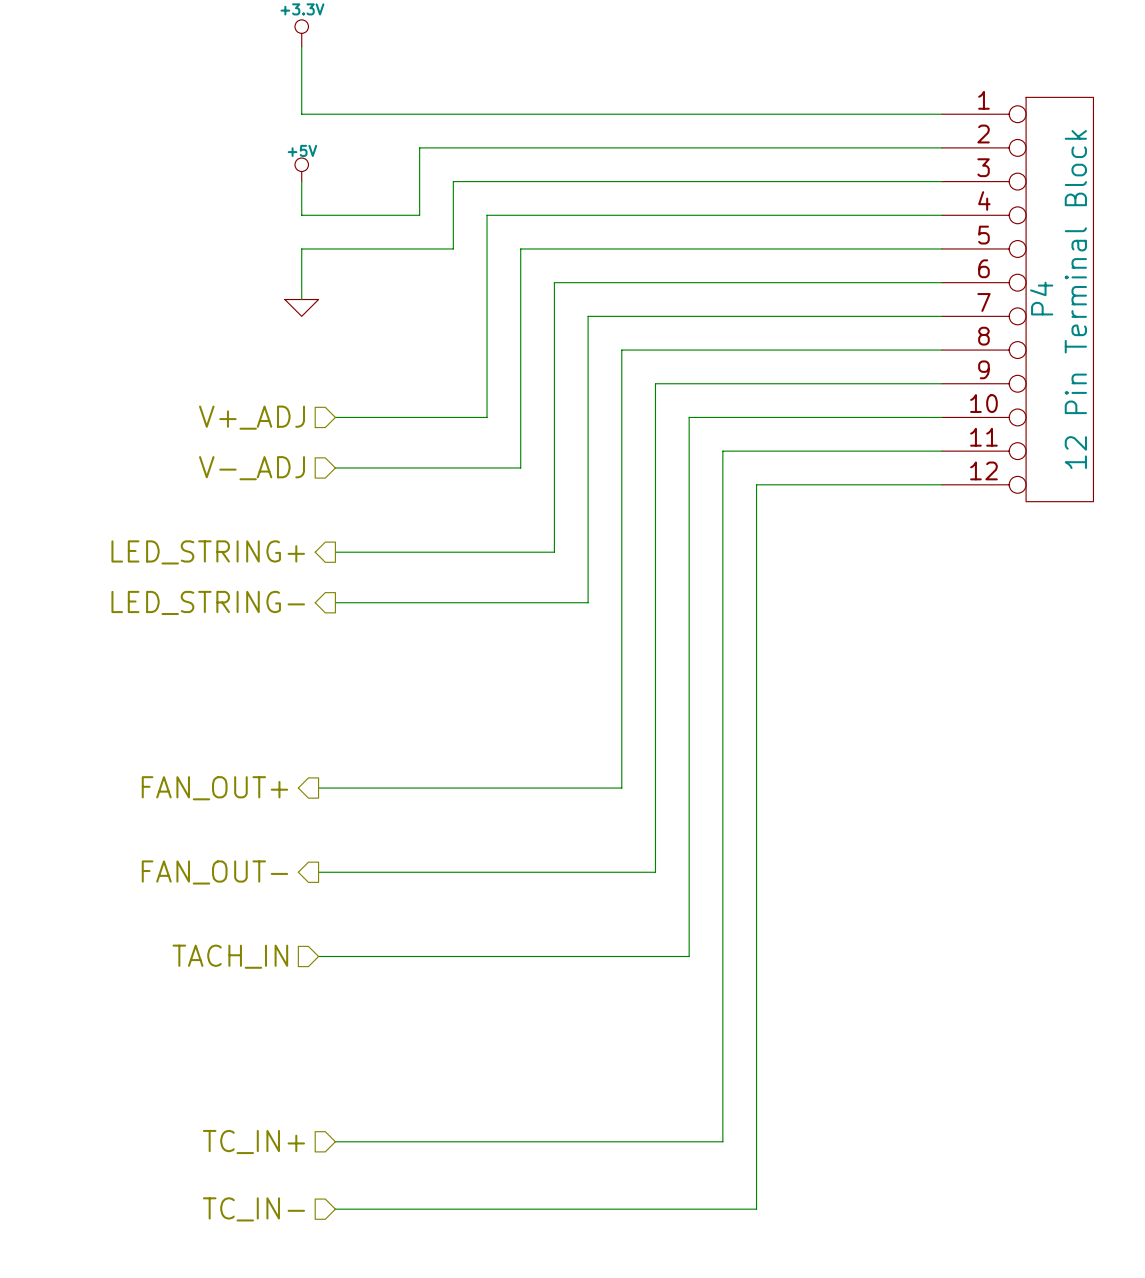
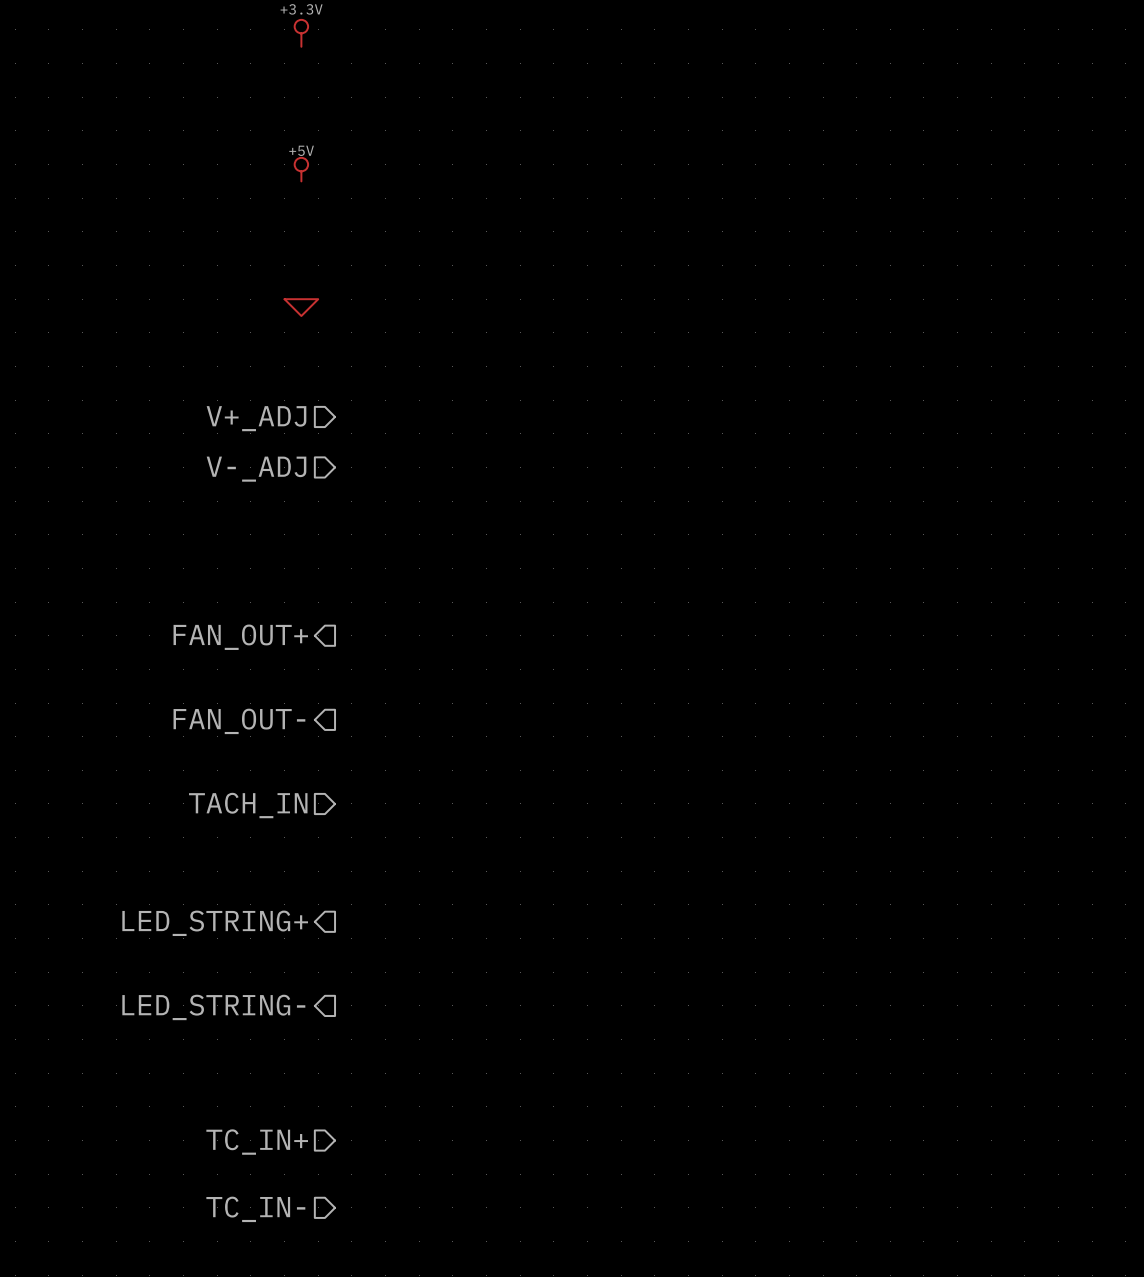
wire: (301, 46) (301, 114) (941, 114) -> none
wire: (941, 147) (419, 147) (419, 215) (301, 215) (301, 181) -> none
wire: (941, 181) (453, 181) (453, 248) (301, 248) (301, 299) -> none
wire: (941, 215) (487, 215) (487, 417) (335, 417) -> none
wire: (941, 248) (520, 248) (520, 467) (335, 467) -> none
wire: (941, 282) (554, 282) (554, 552) (335, 552) -> none
P4: 12 Pin Terminal Block (1017, 299) -> none
wire: (941, 316) (588, 316) (588, 602) (335, 602) -> none
wire: (941, 350) (621, 350) (621, 788) (318, 788) -> none
wire: (941, 383) (655, 383) (655, 872) (318, 872) -> none
wire: (941, 417) (689, 417) (689, 956) (318, 956) -> none
wire: (941, 451) (722, 451) (722, 1141) (335, 1141) -> none
wire: (941, 484) (756, 484) (756, 1209) (335, 1209) -> none
hierarchical label: LED_STRING+ (208, 552) -> none
hierarchical label: LED_STRING- (208, 602) -> none
hierarchical label position: FAN_OUT+ (214, 788) -> FAN_OUT+ (240, 637)
hierarchical label position: FAN_OUT- (214, 872) -> FAN_OUT- (239, 721)
hierarchical label: none -> LED_STRING+ (215, 923)
hierarchical label position: TACH_IN (230, 956) -> TACH_IN (248, 805)
hierarchical label: none -> LED_STRING- (213, 1007)

